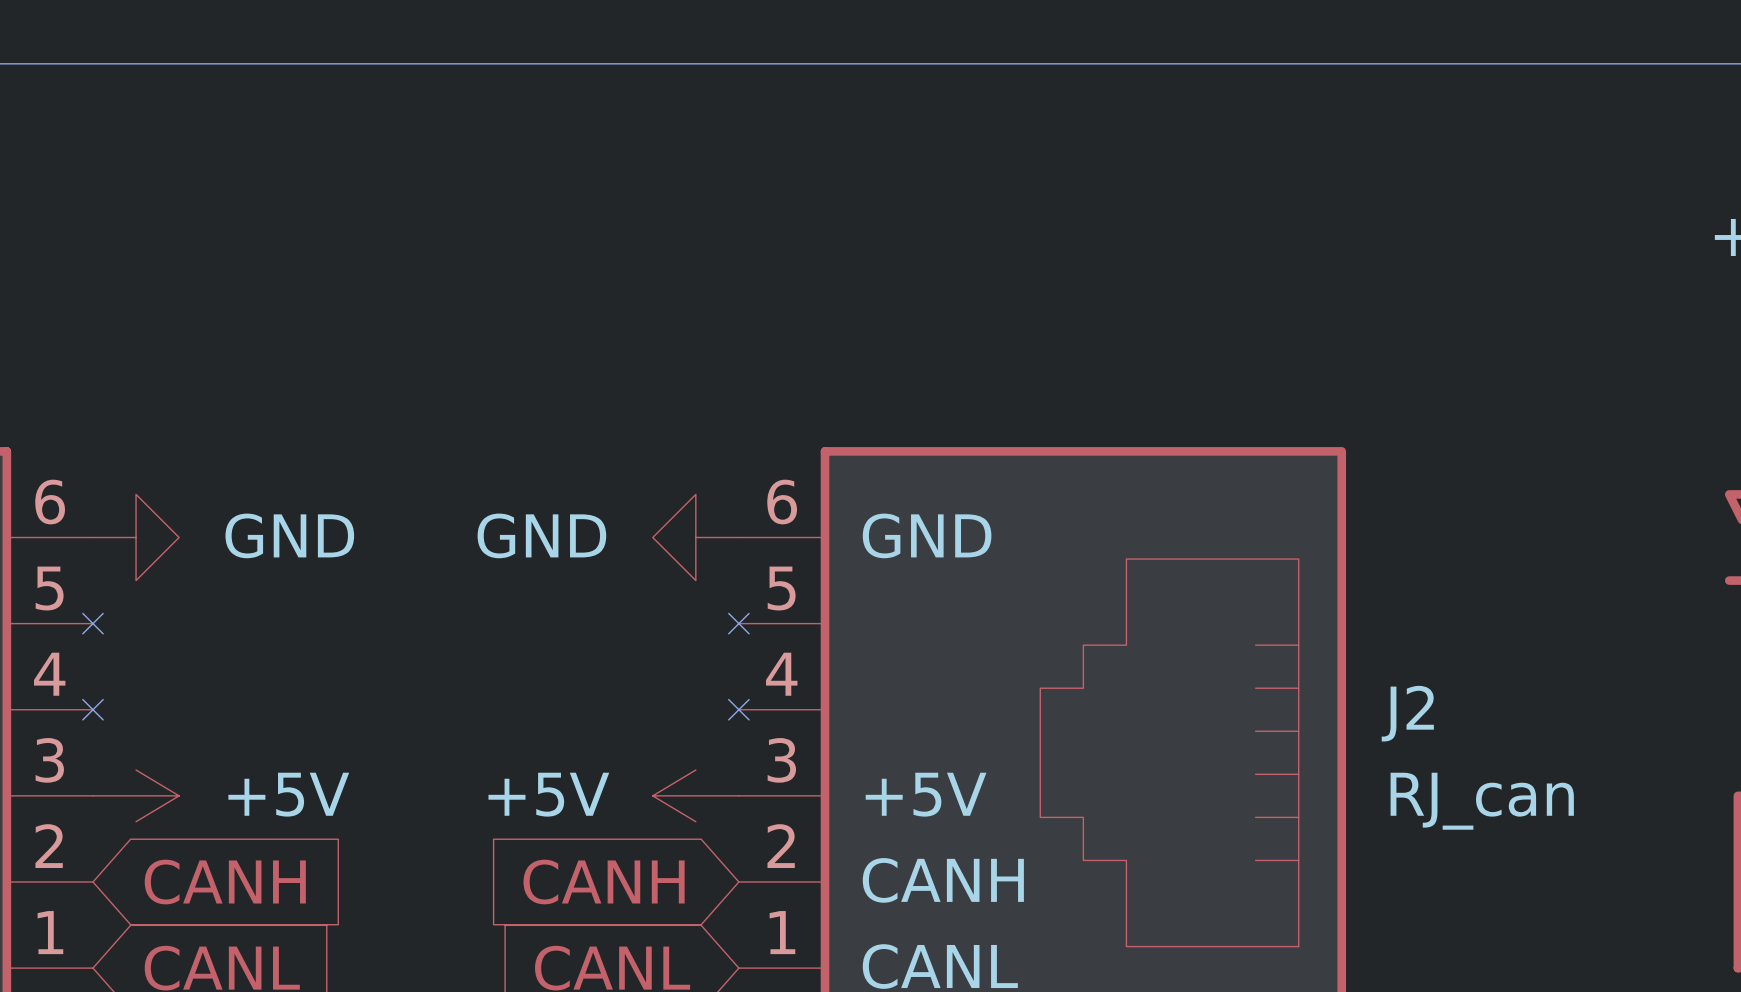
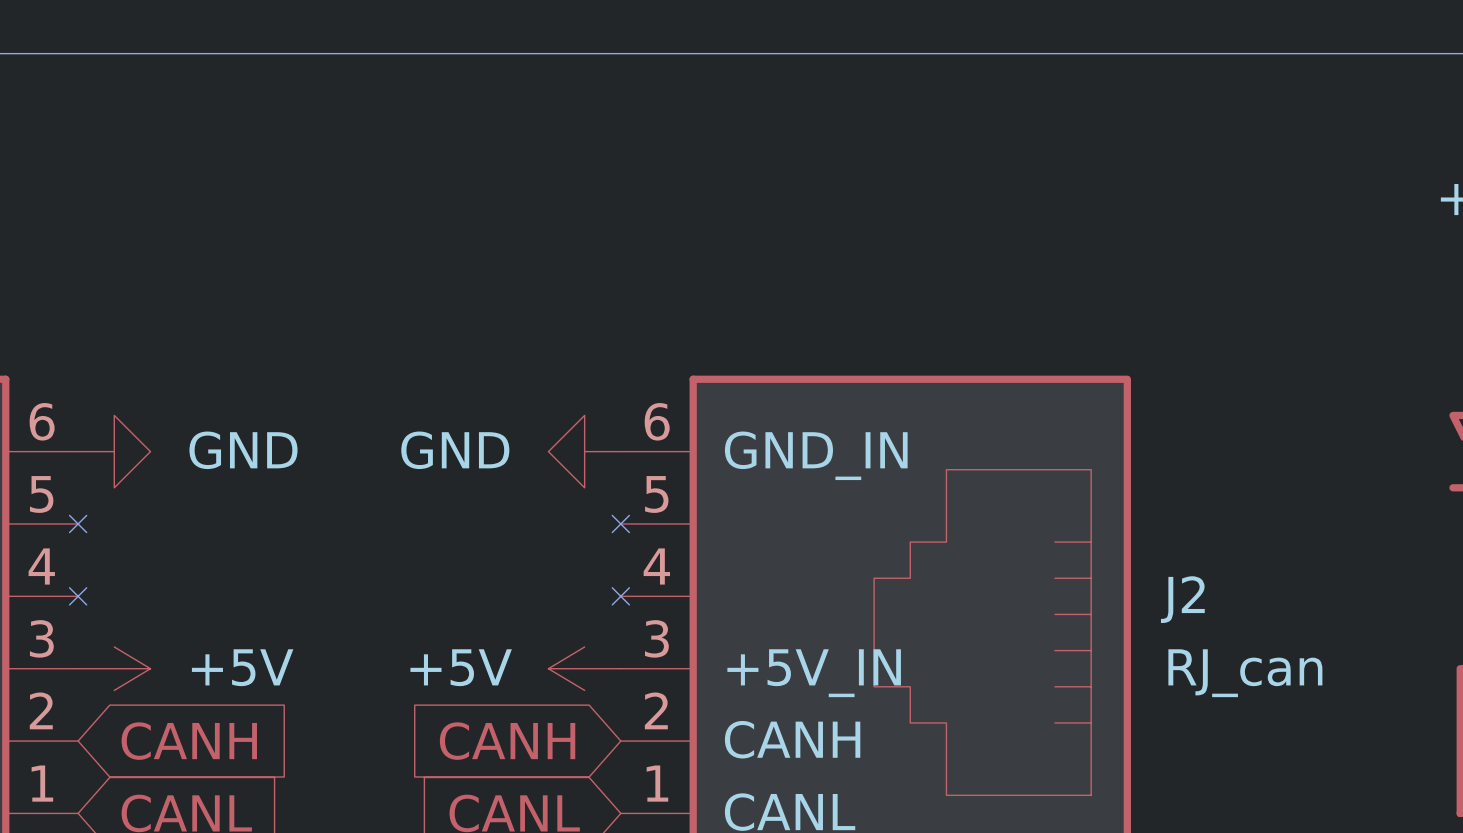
J2 pin name: GND (927, 535) -> GND_IN (816, 455)
J2 pin name: +5V (926, 794) -> +5V_IN (814, 673)

